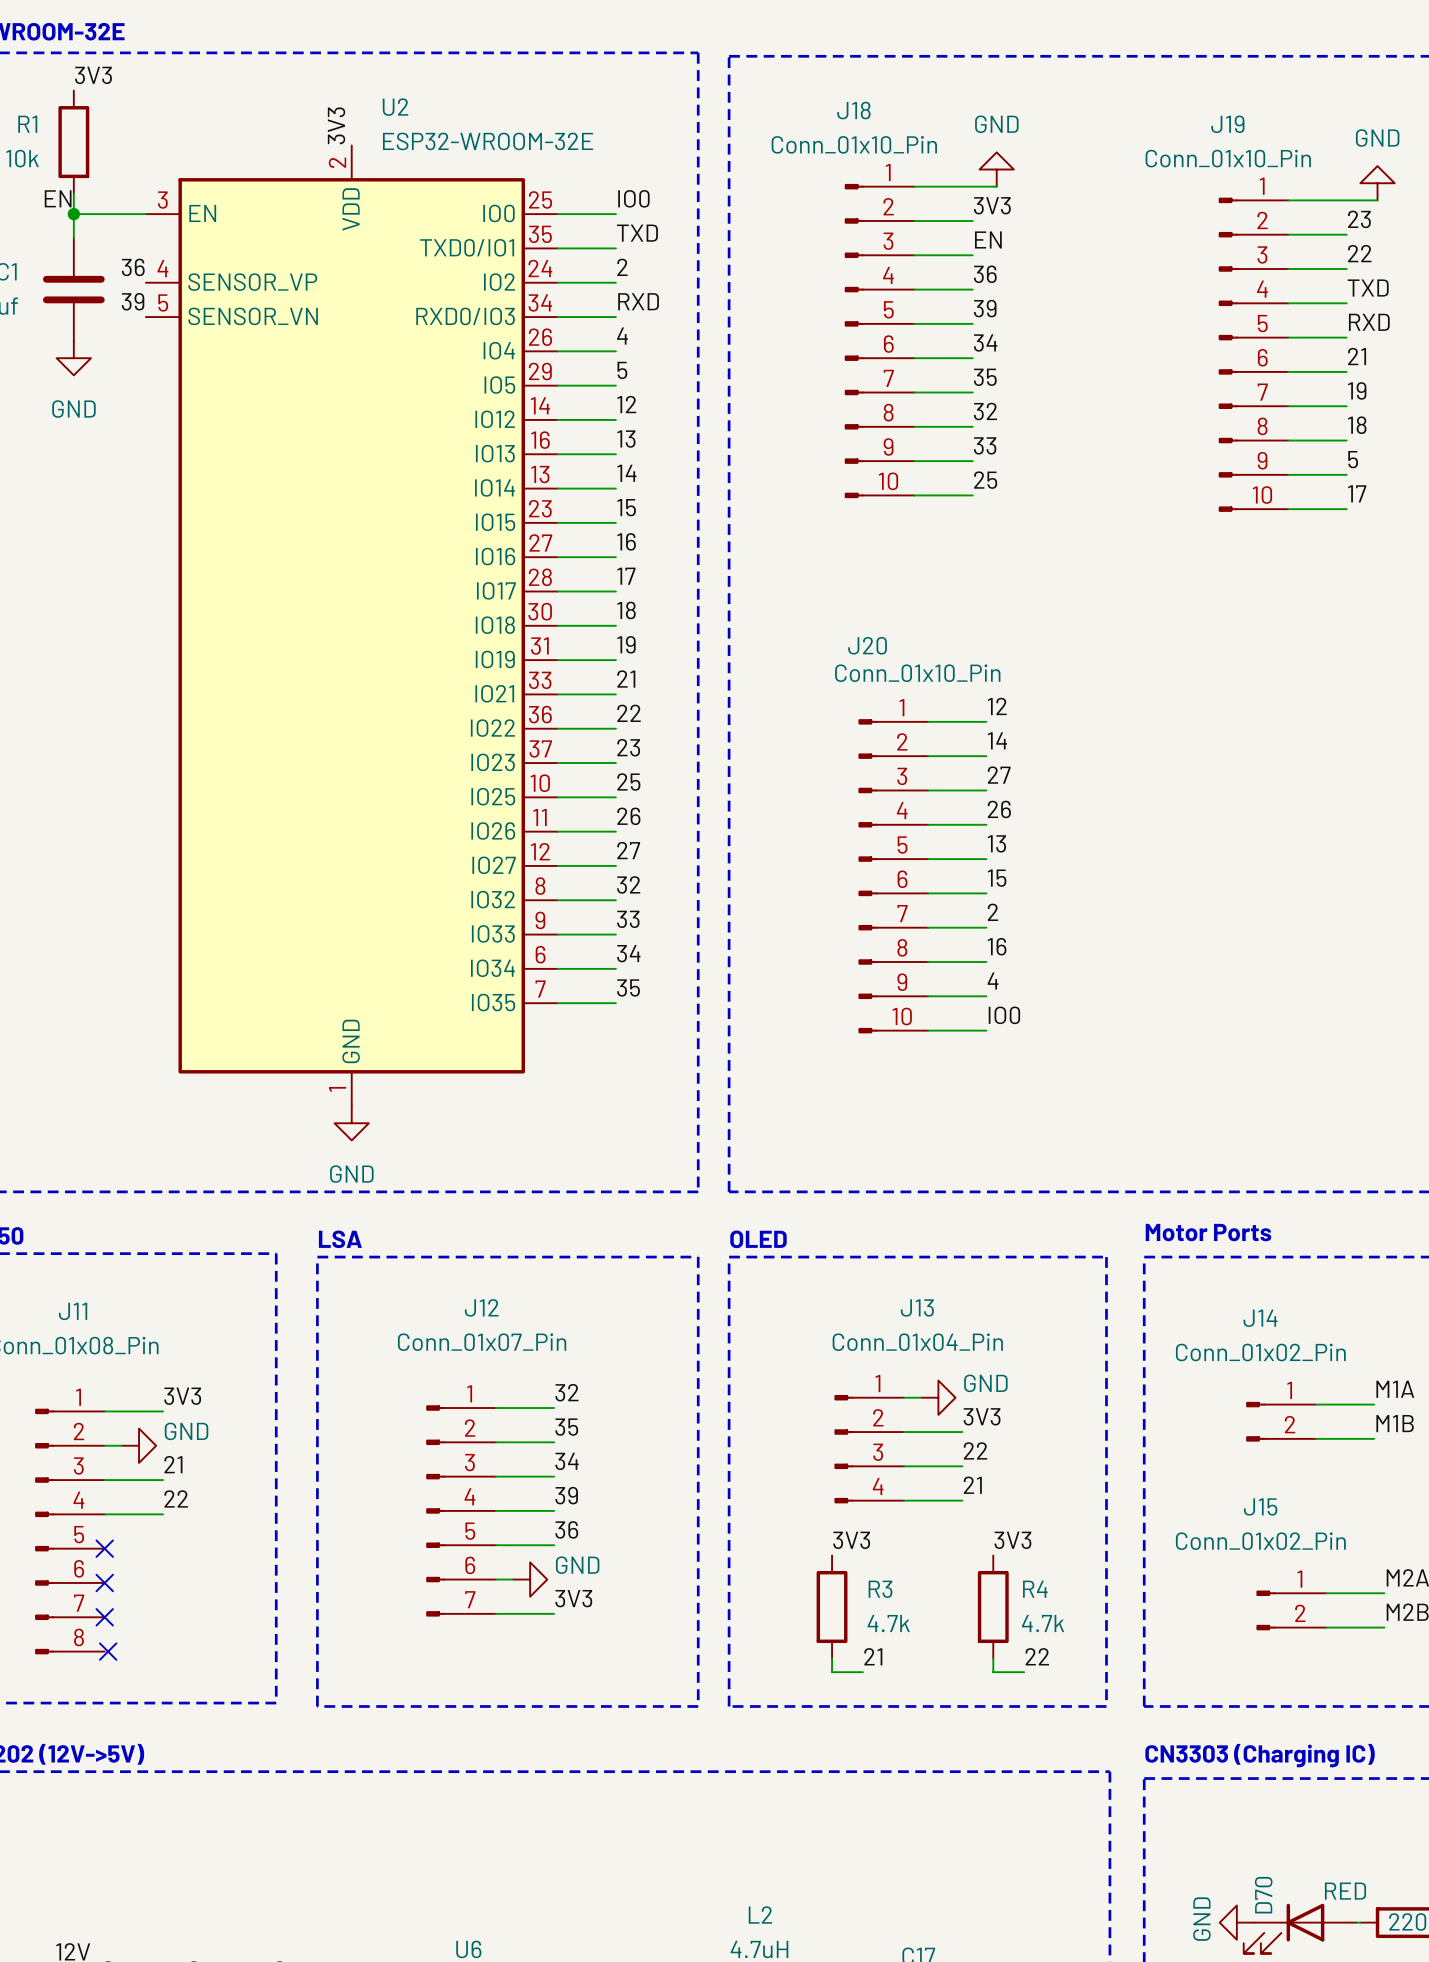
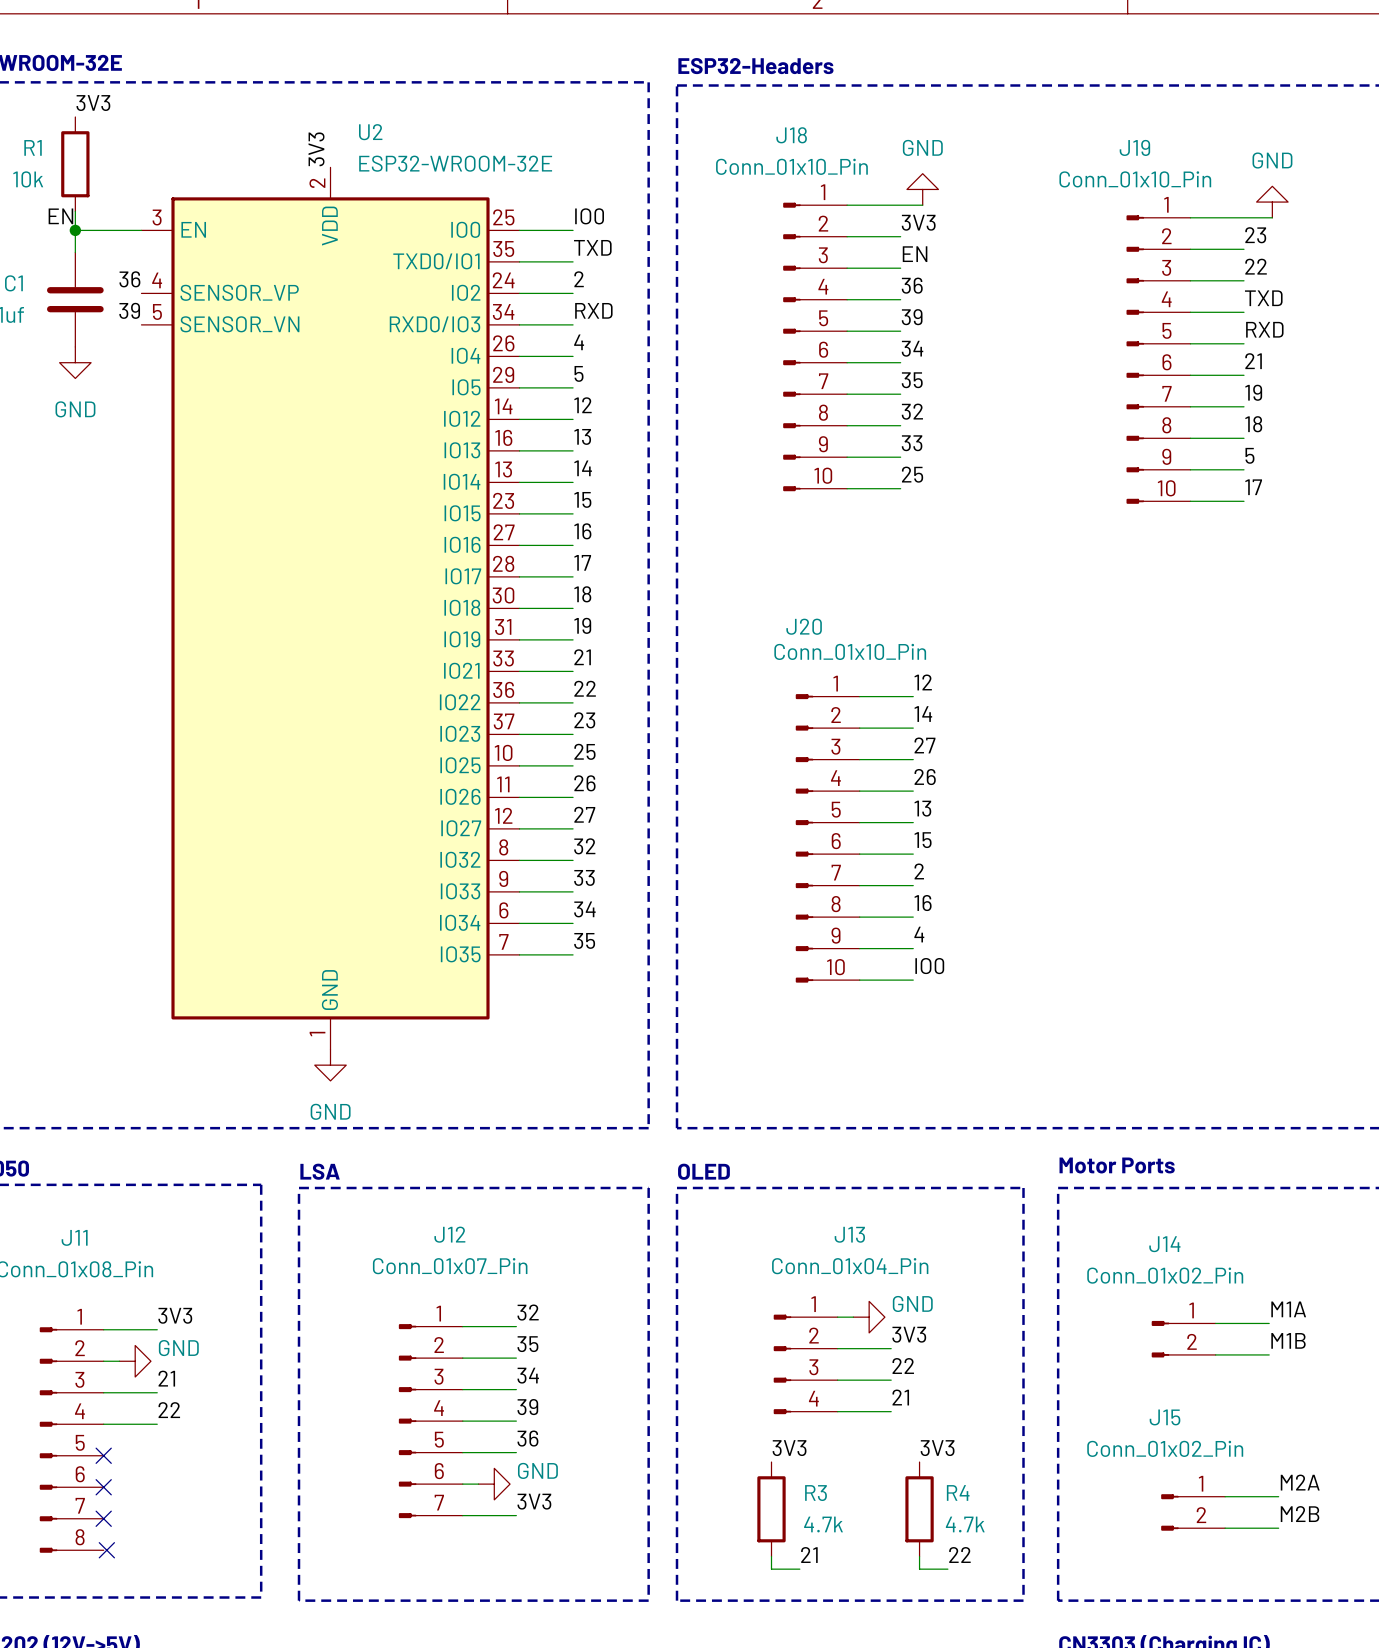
text: none -> ESP32-Headers (755, 66)

